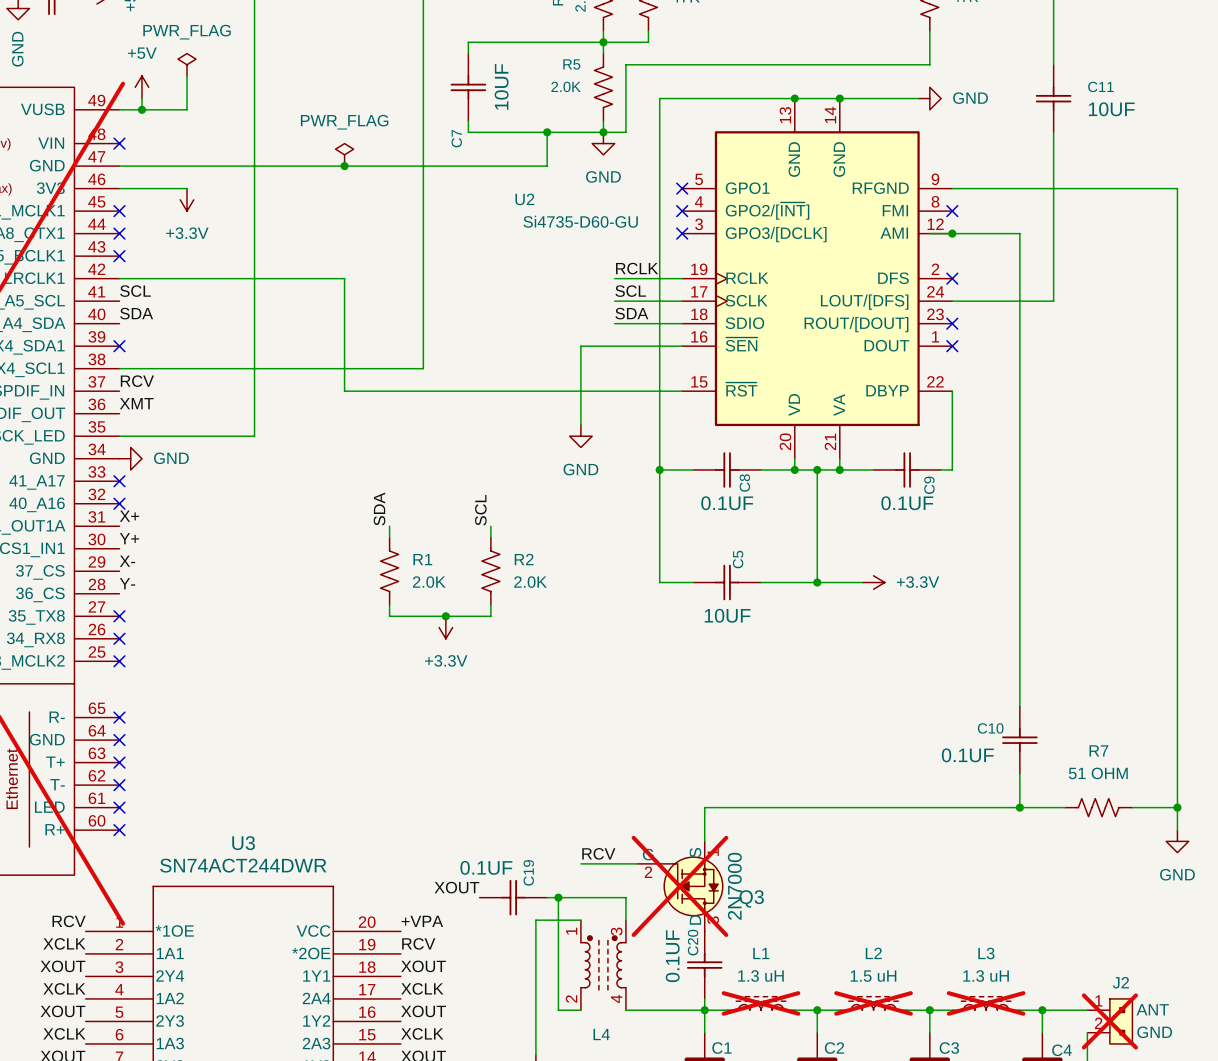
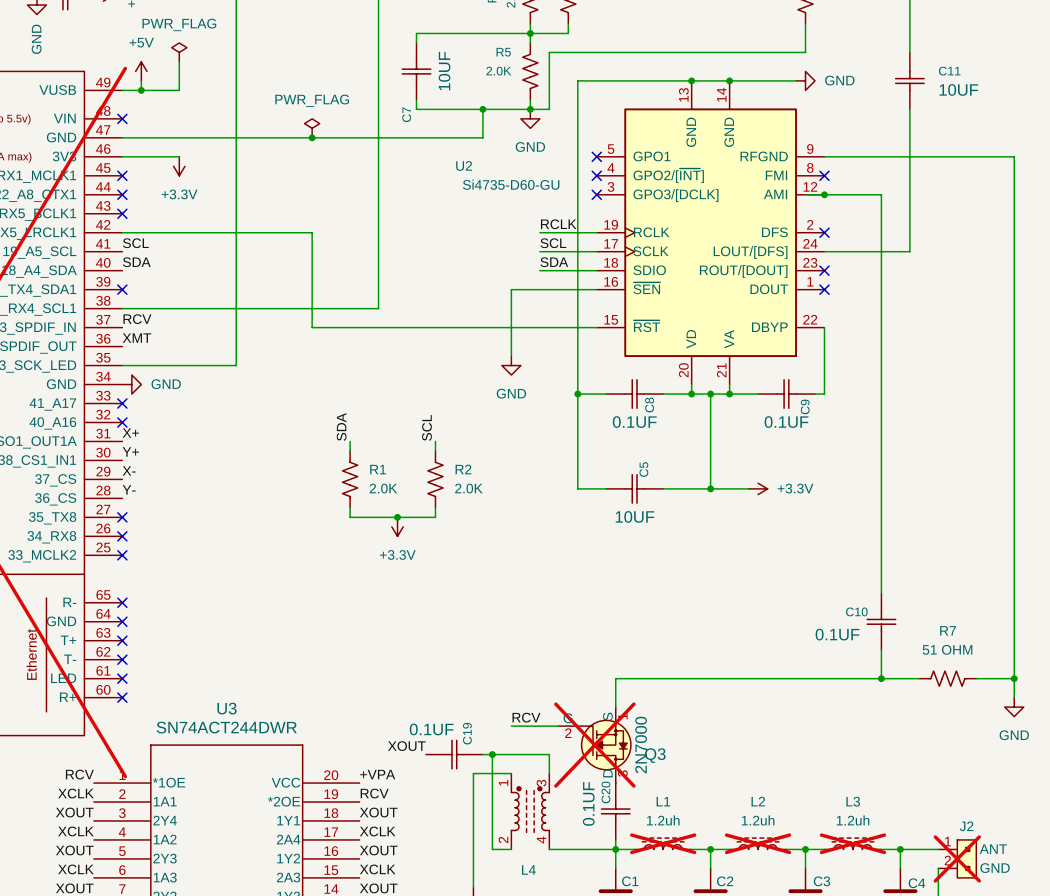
L1 value: 1.3 uH (760, 976) -> 1.2uh (663, 820)
L2 value: 1.5 uH (873, 976) -> 1.2uh (758, 820)
L3 value: 1.3 uH (986, 976) -> 1.2uh (853, 820)

